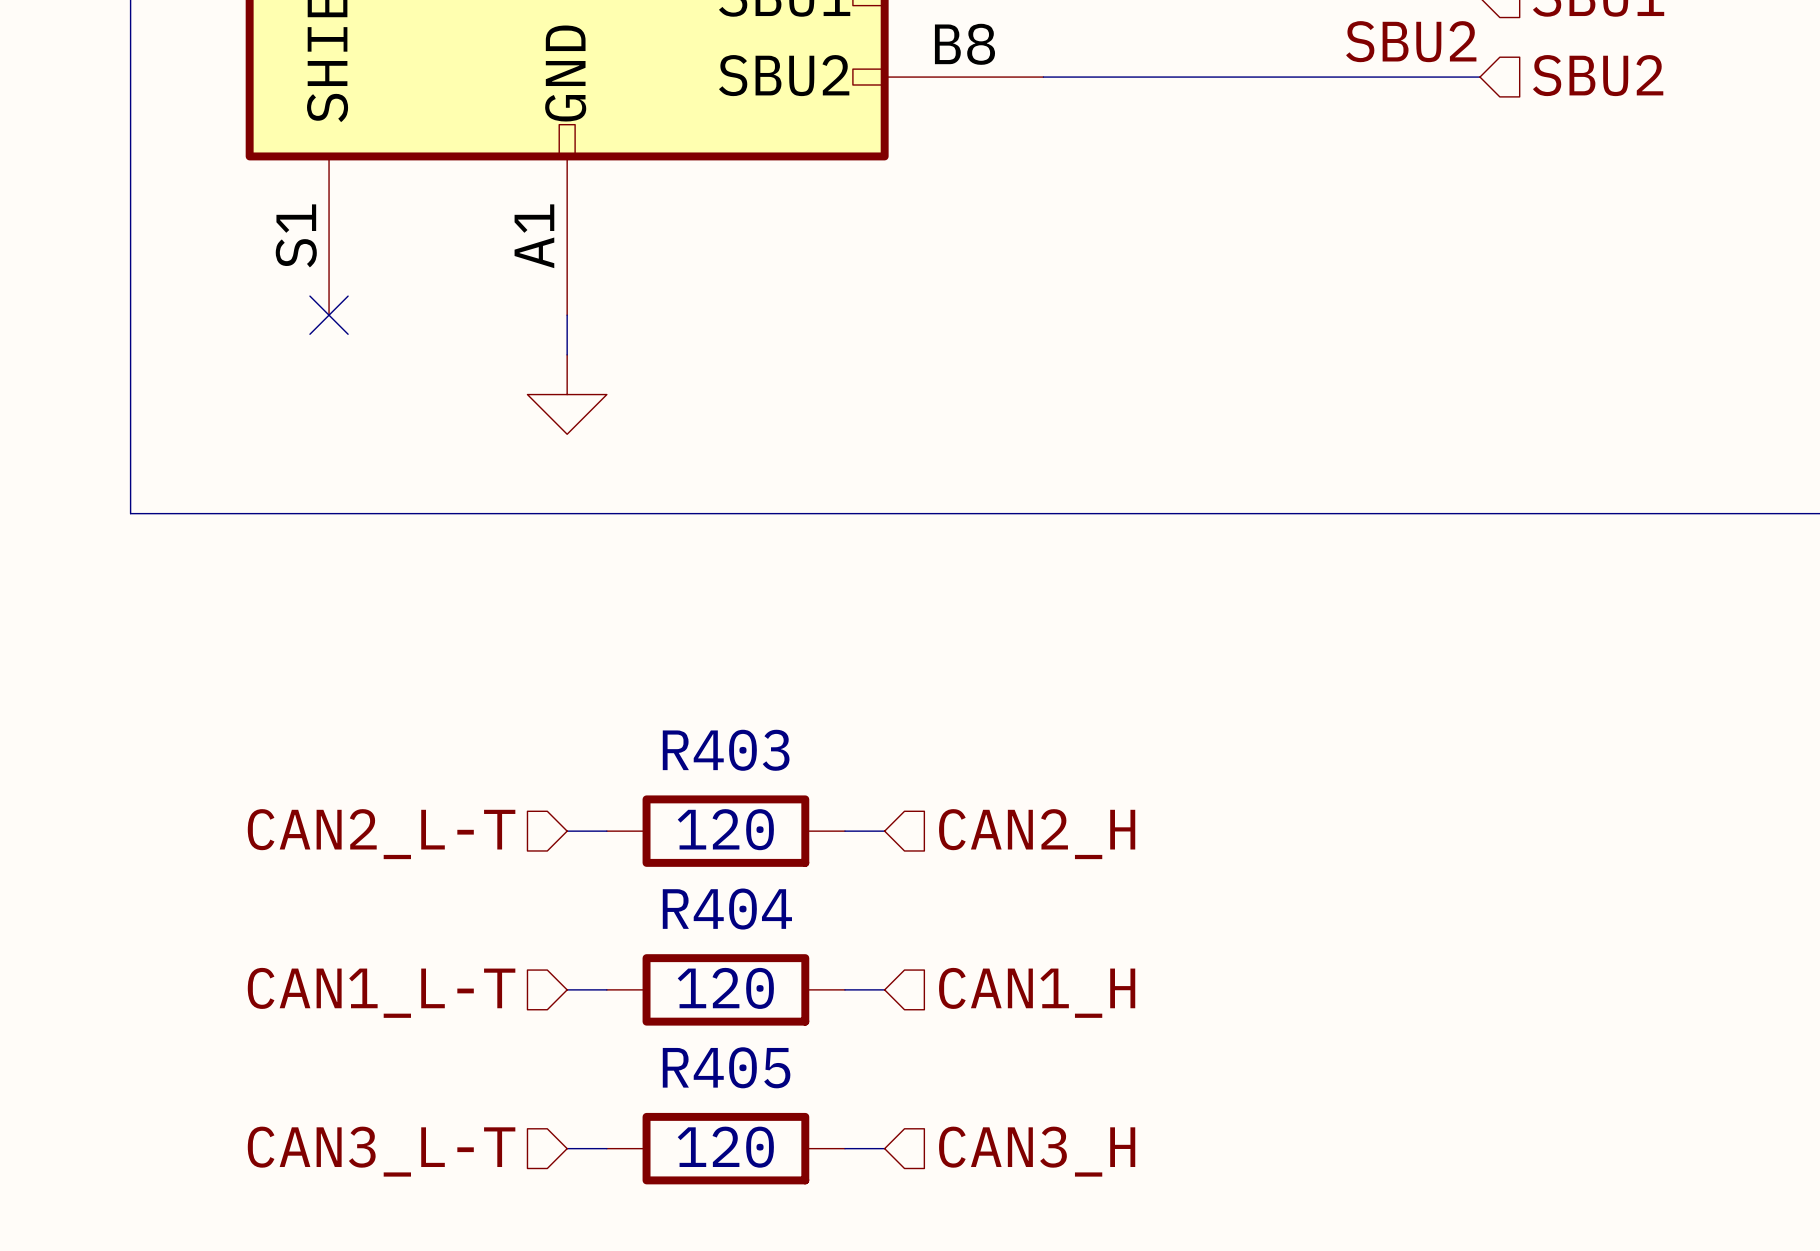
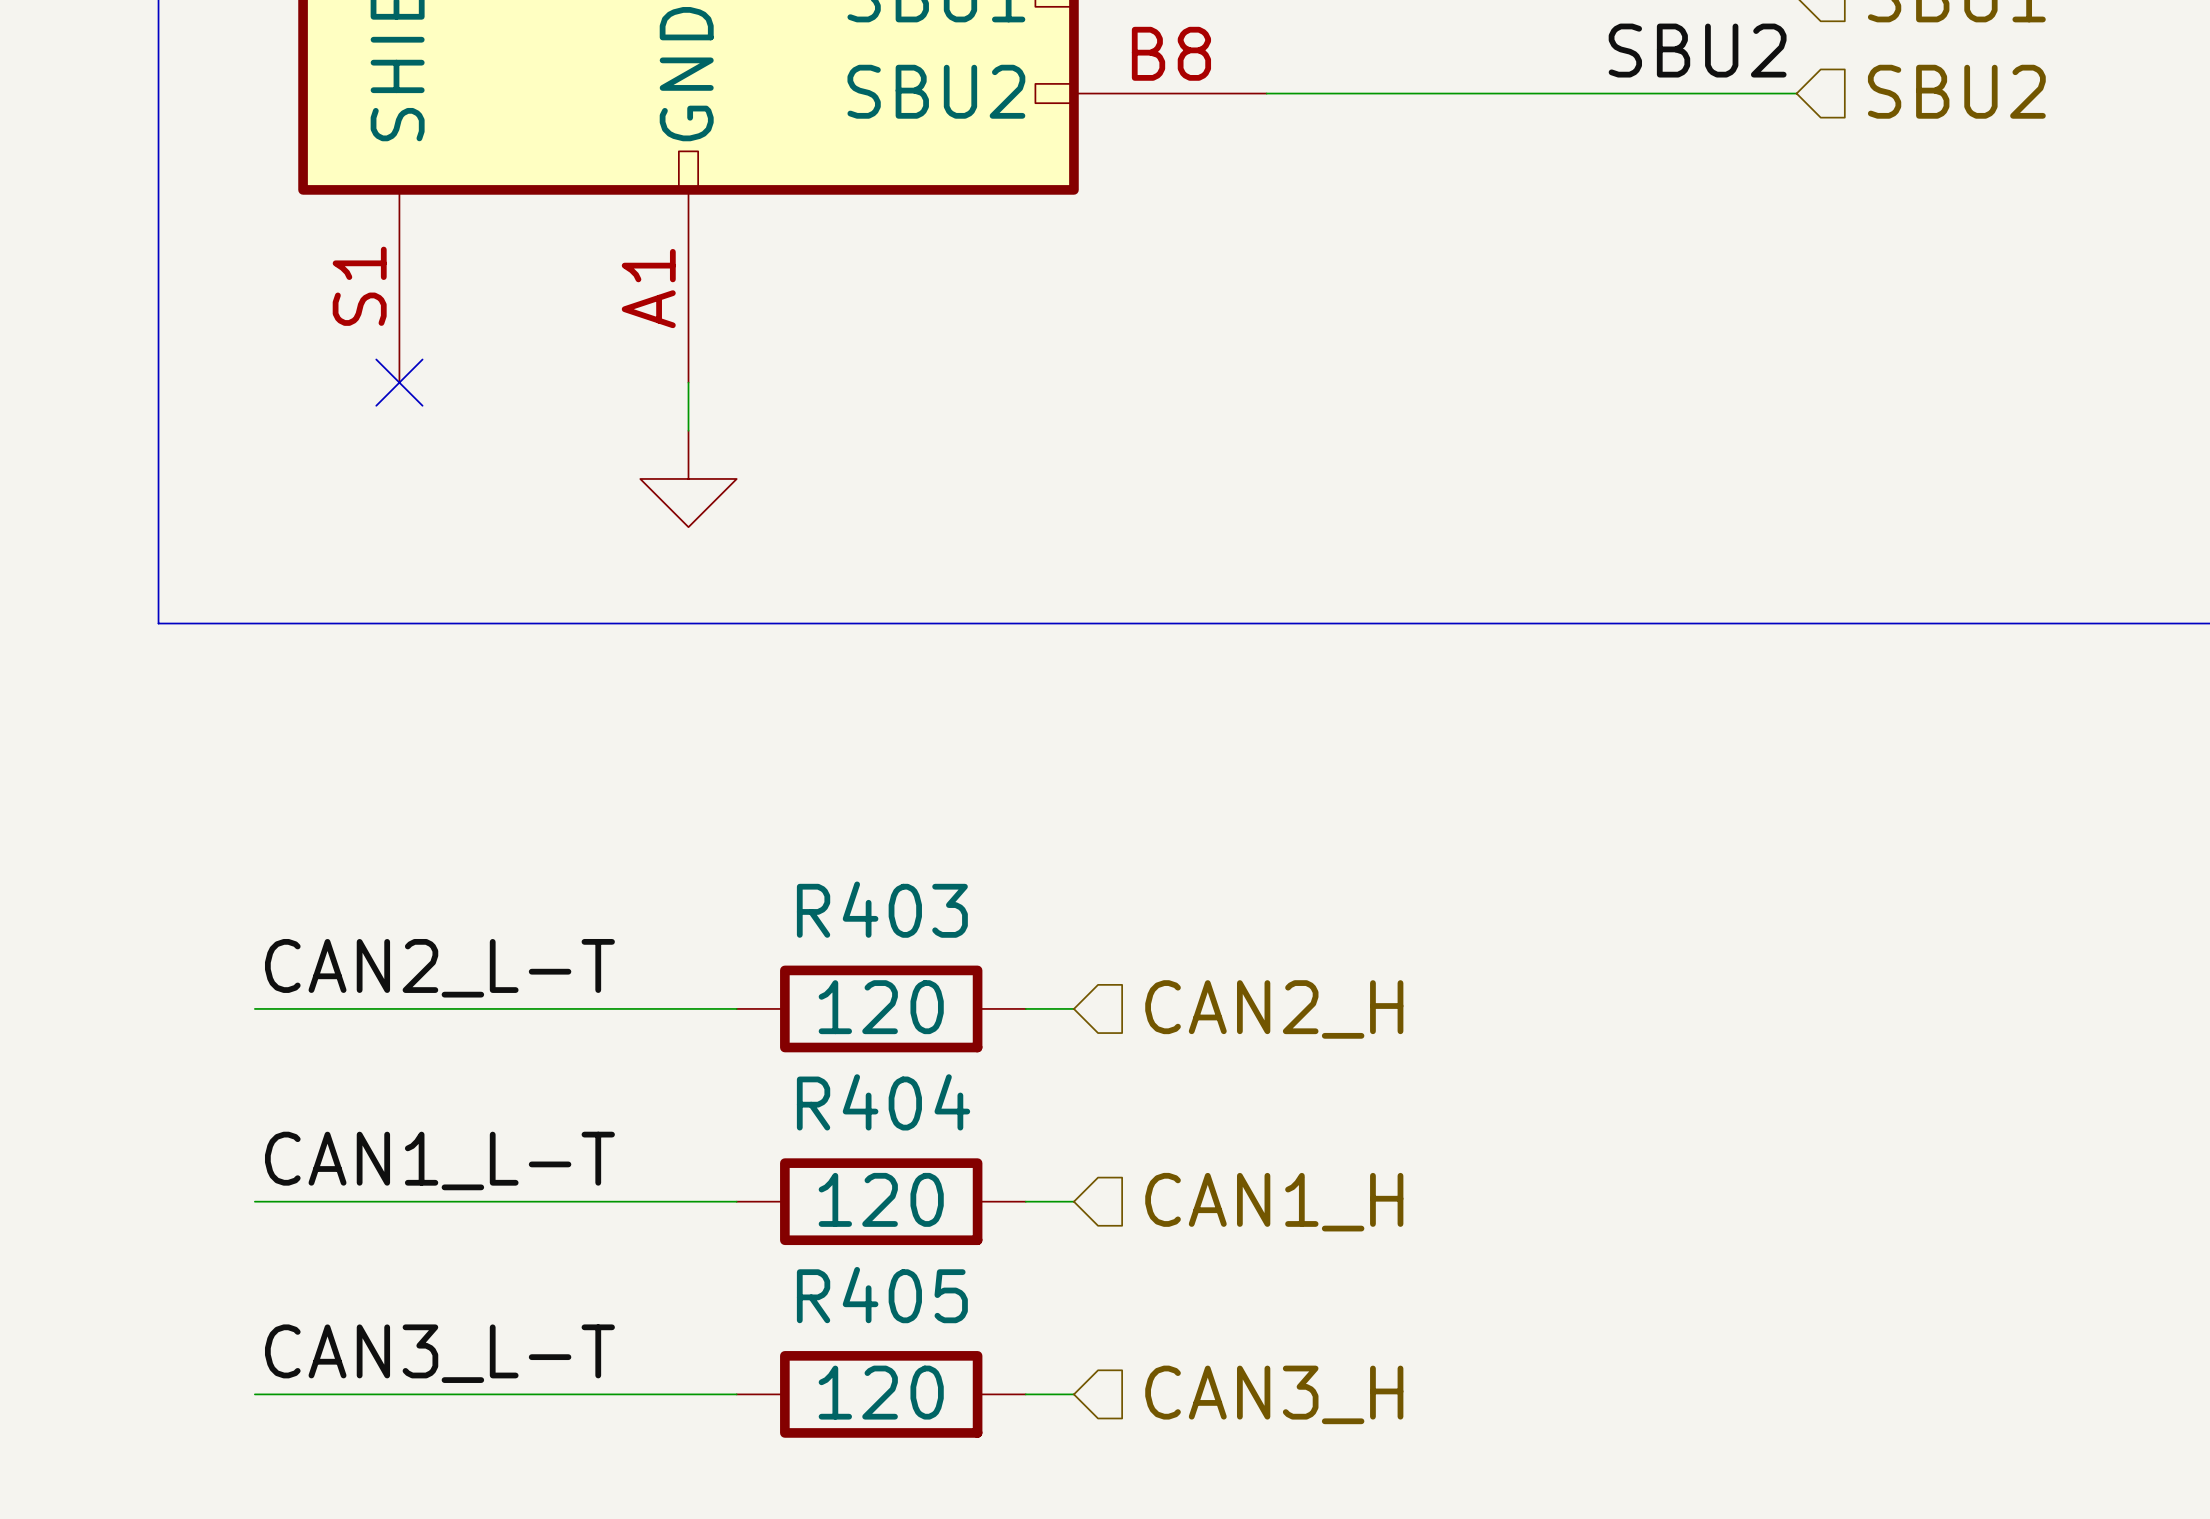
label: none -> CAN2_L-T (439, 968)
wire: none -> (254, 1008) (688, 1008)
hierarchical label: CAN2_L-T (381, 834) -> none
label: none -> CAN1_L-T (439, 1160)
wire: none -> (254, 1201) (688, 1201)
hierarchical label: CAN1_L-T (381, 992) -> none
label: none -> CAN3_L-T (439, 1353)
wire: none -> (254, 1394) (688, 1394)
hierarchical label: CAN3_L-T (381, 1151) -> none

